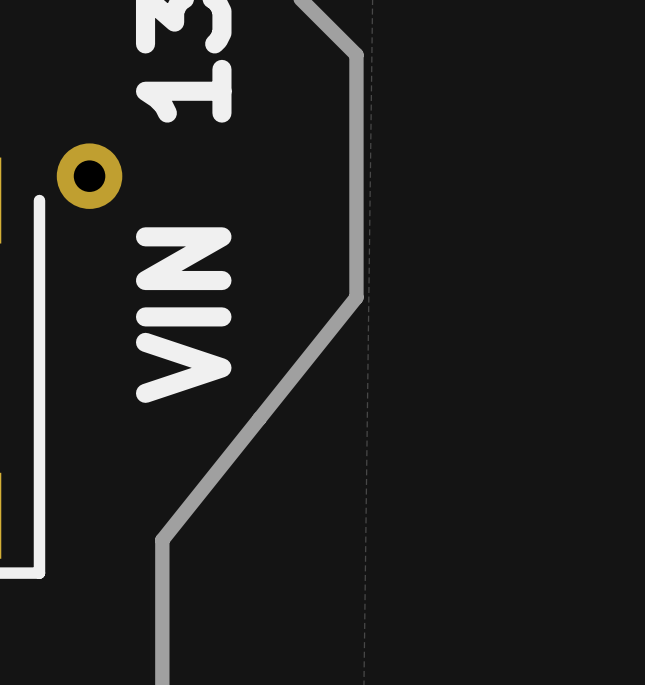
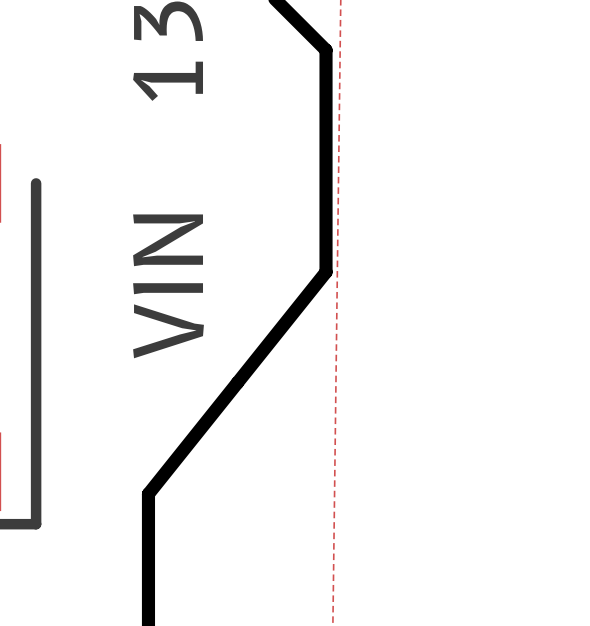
via: (89, 176) -> none

